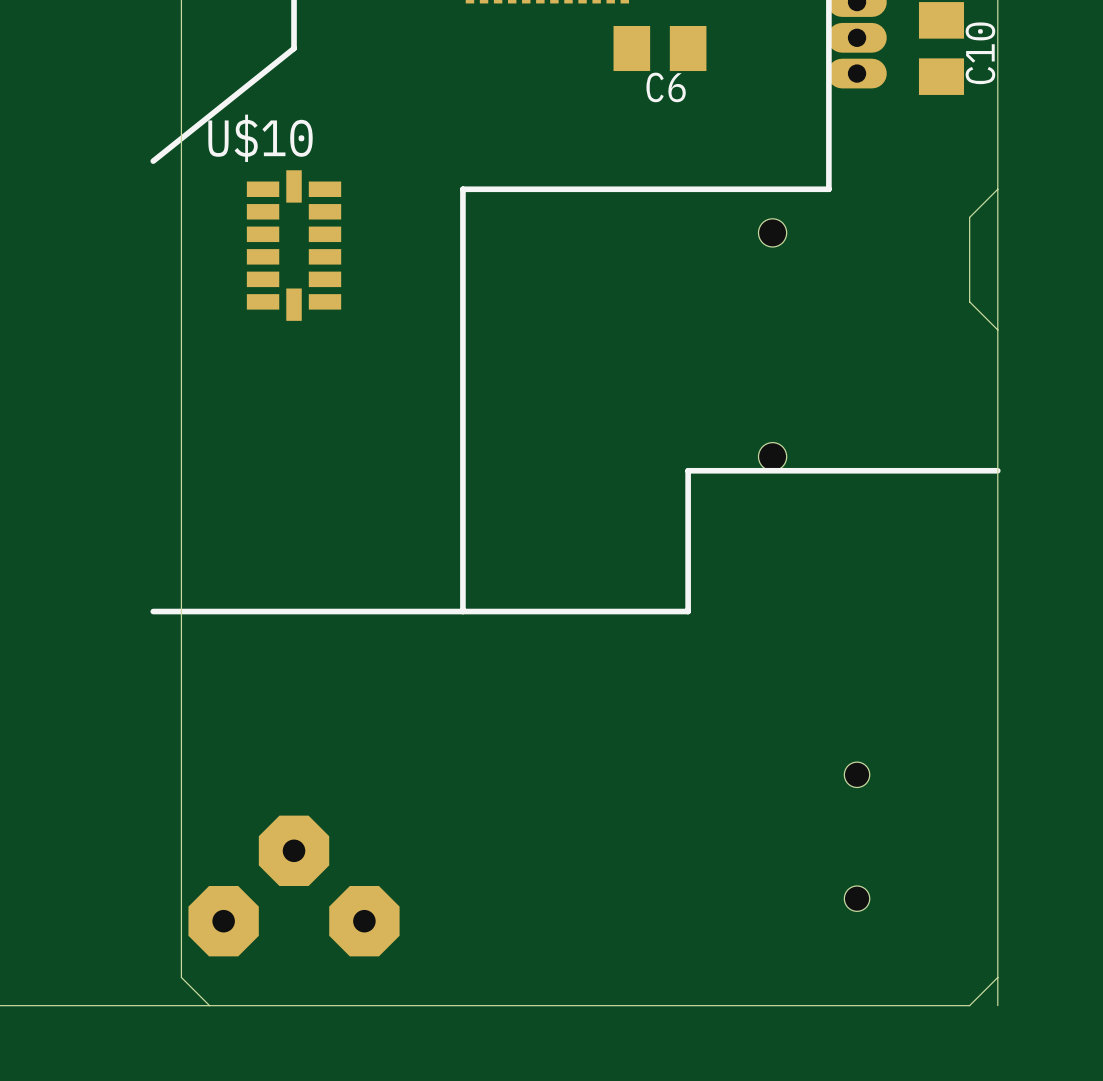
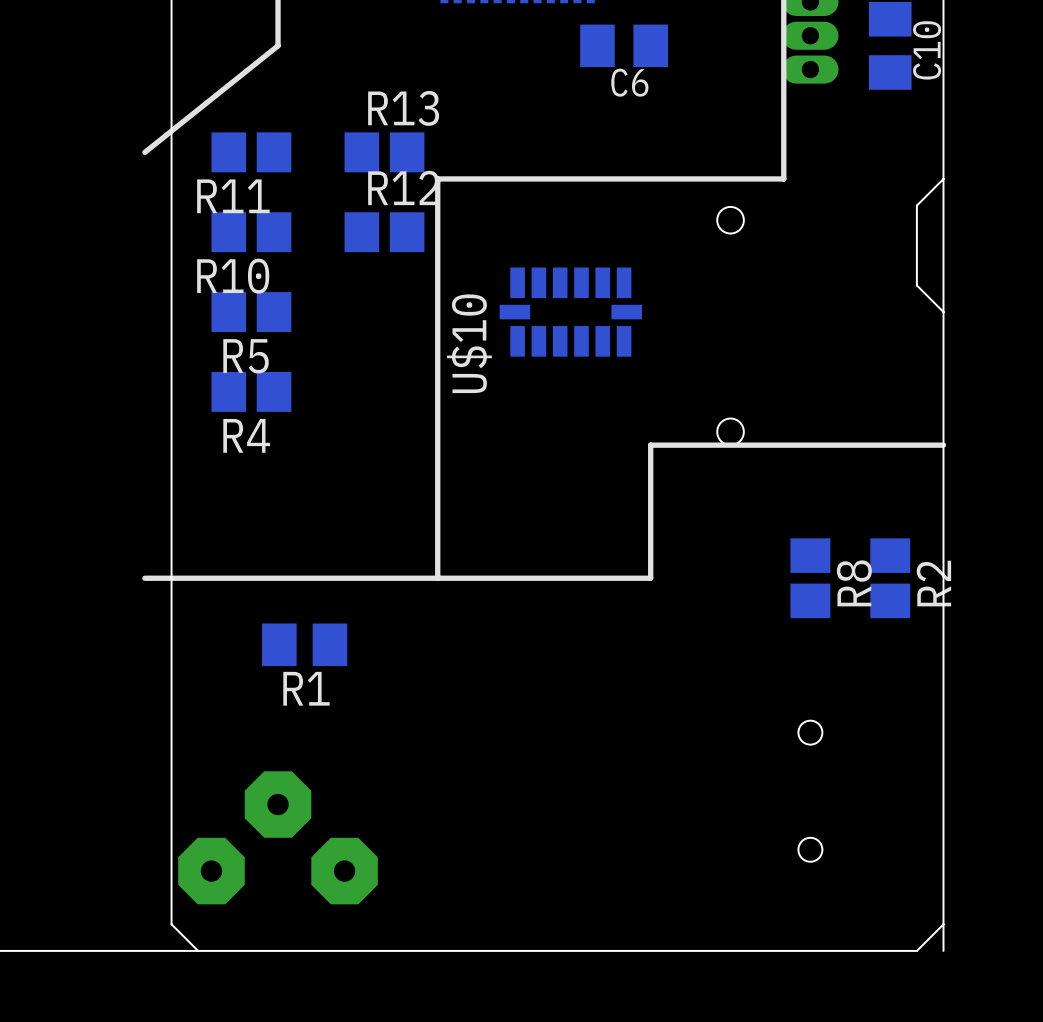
U$10 name position: U$10 (260, 138) -> U$10 (469, 343)
R11: none -> (251, 152)
R13: none -> (384, 152)
R10: none -> (251, 232)
U$10 rotation: 0° (294, 245) -> 90° clockwise (570, 312)
U$10 position: (294, 245) -> (570, 312)
R12: none -> (384, 232)
R5: none -> (251, 312)
R4: none -> (251, 391)
R8: none -> (810, 578)
R2: none -> (890, 578)
R1: none -> (304, 644)

